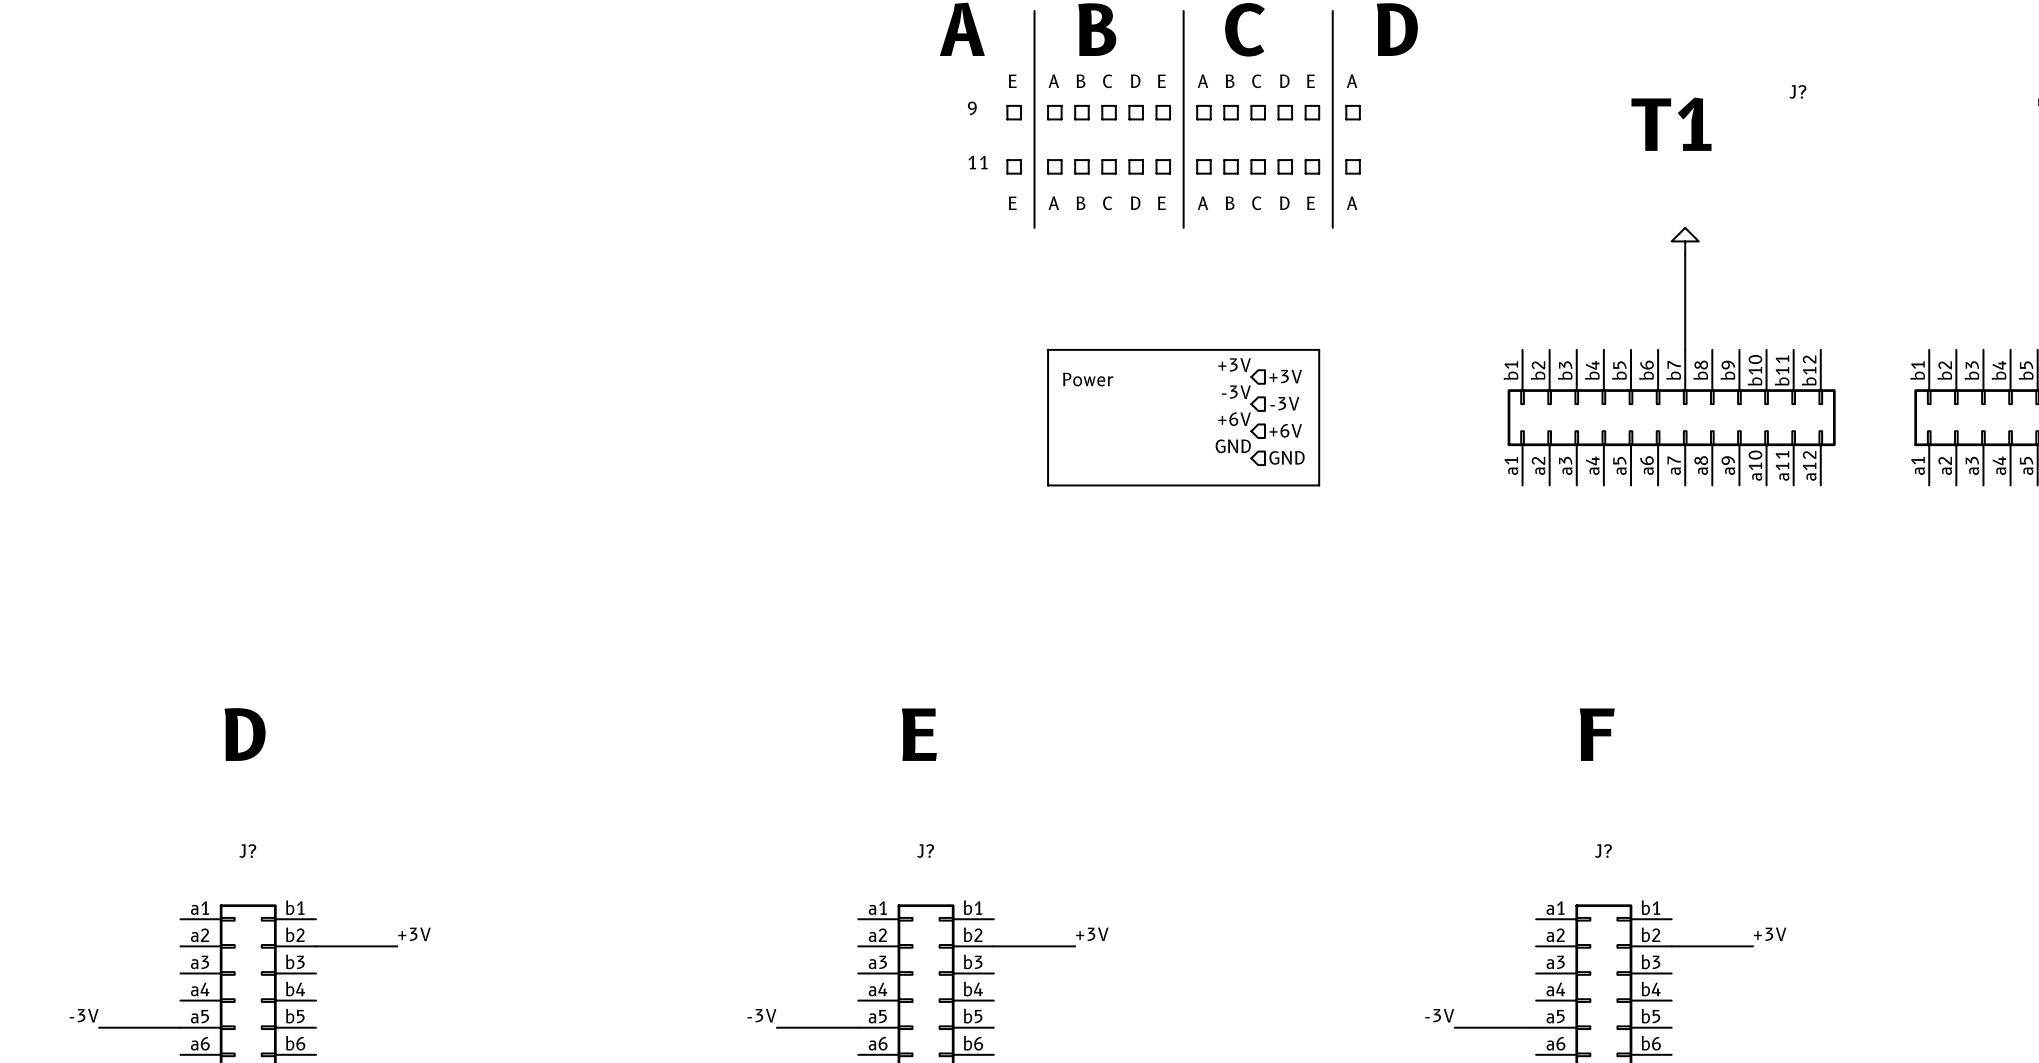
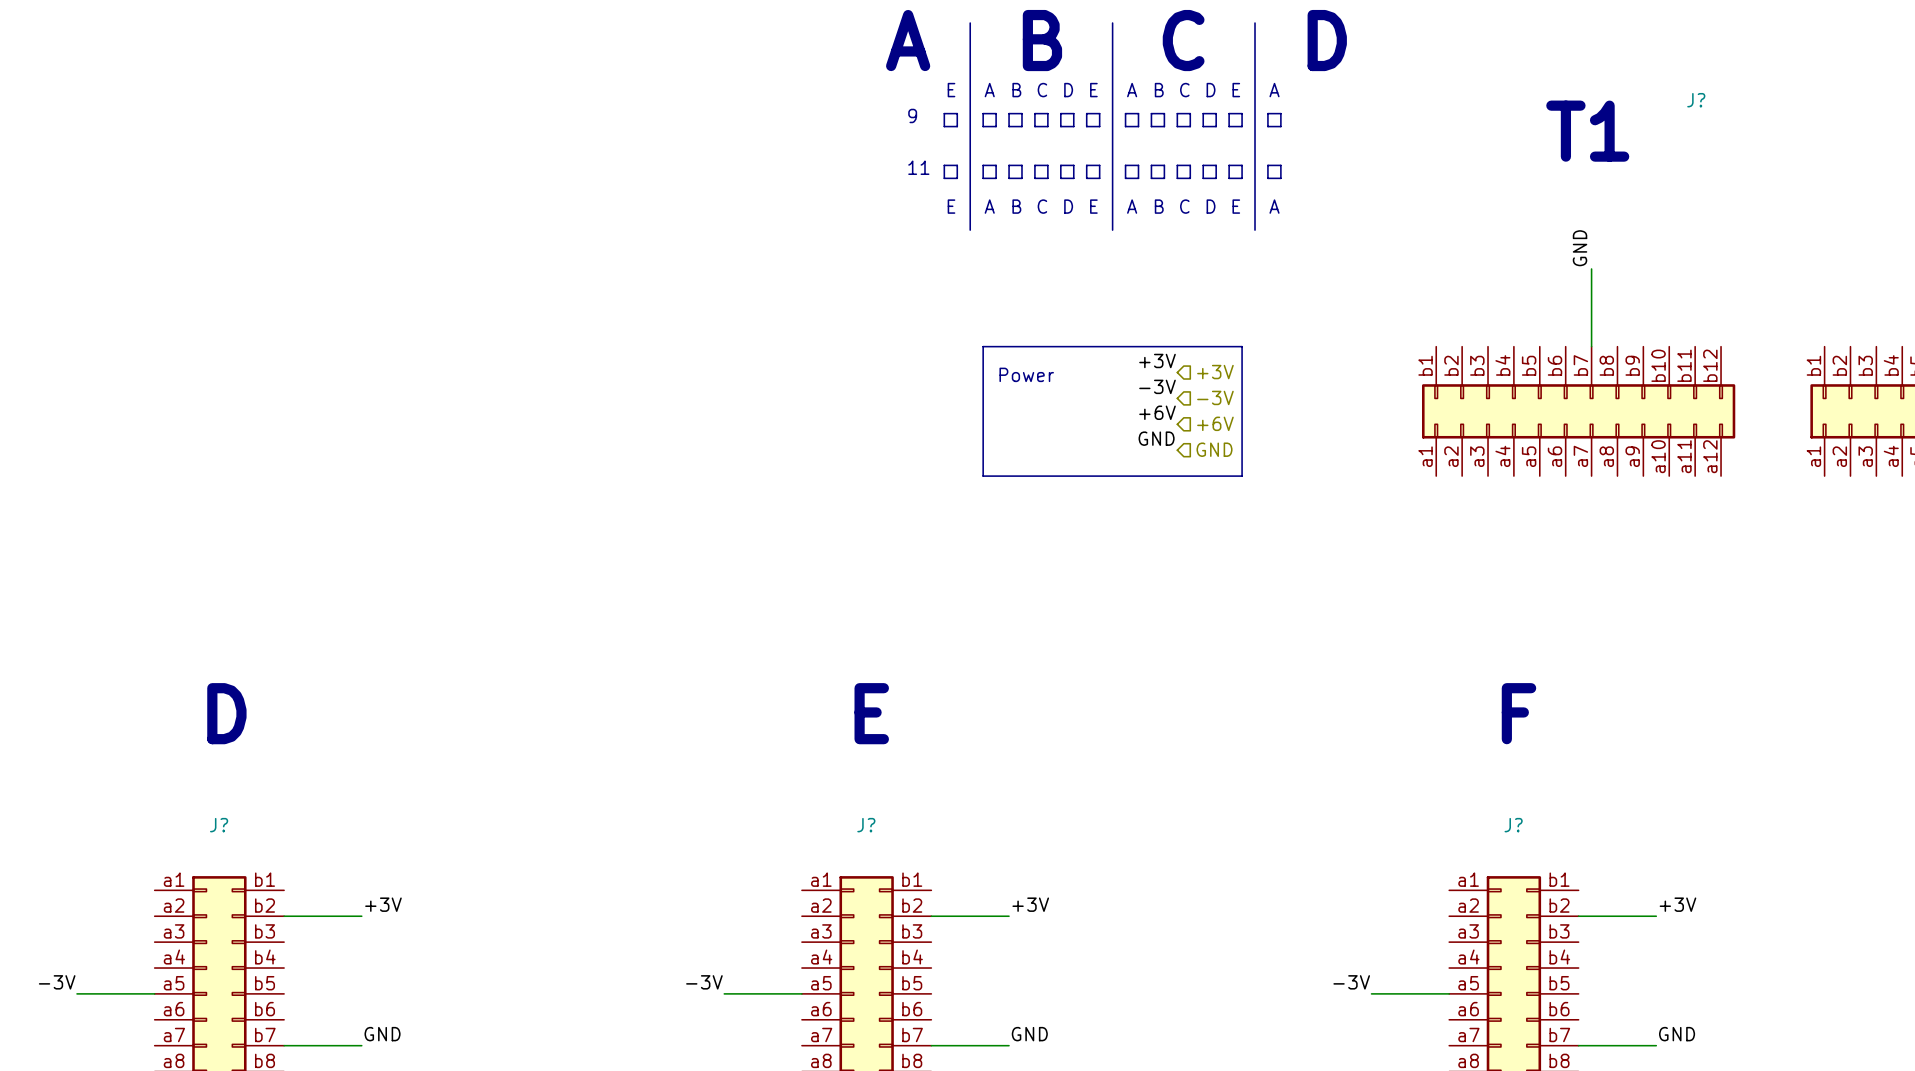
power symbol: (1685, 241) -> none
label: none -> GND (1580, 248)
wire: (1685, 254) (1685, 268) -> none

